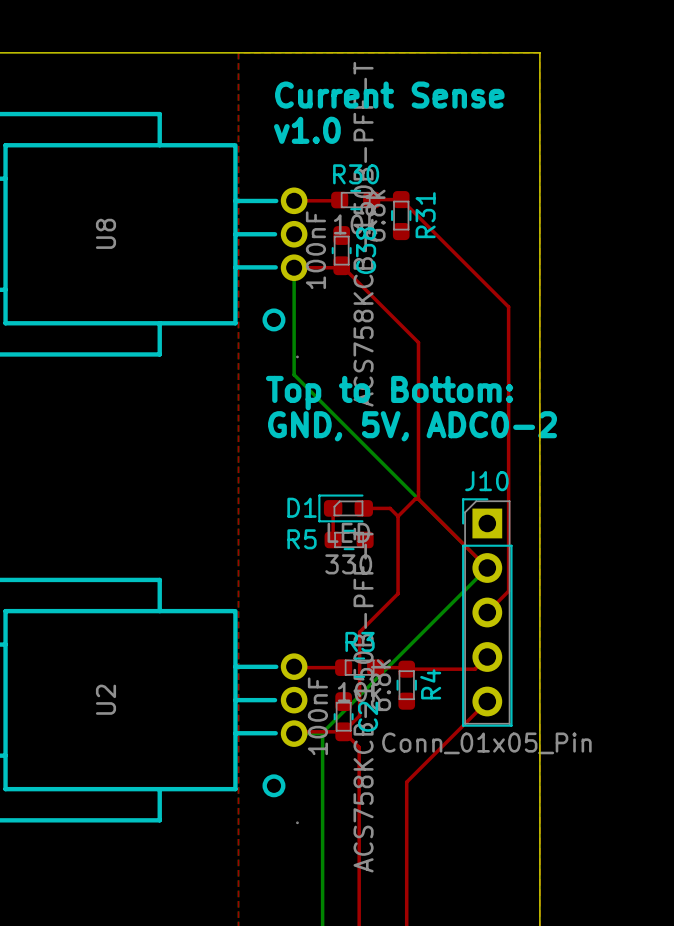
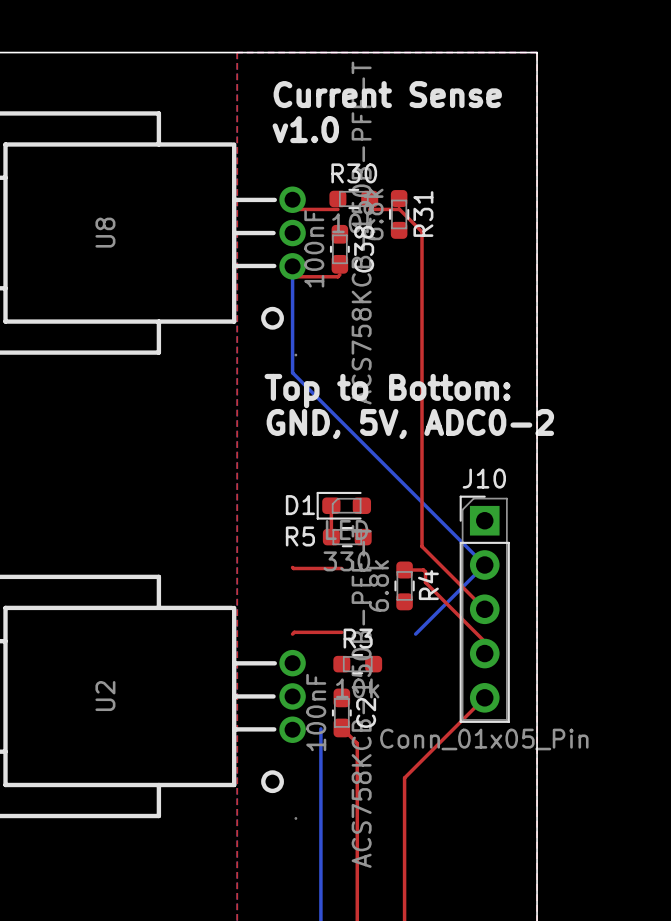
top track: (339, 200) (294, 200) -> none
top track: (371, 200) (401, 199) (508, 306) (508, 591) (487, 612) -> (369, 209) (399, 209) (422, 231) (422, 546) (484, 609)
top track: none -> (337, 209) (292, 210)
top track: (294, 267) (339, 267) (341, 265) (418, 342) (418, 499) -> none
top track: none -> (339, 274) (337, 276) (292, 276)
top track: (418, 499) (415, 499) (398, 516) -> none
top track: (418, 499) (487, 567) -> none
top track: (363, 508) (390, 508) (398, 516) -> none
top track: (398, 516) (398, 593) (359, 632) (359, 715) (343, 731) (295, 731) (294, 733) -> none
top track: none -> (404, 570) (423, 570) (425, 571) (425, 582) (484, 641) (484, 653) (486, 655)
top track: none -> (341, 632) (294, 632) (292, 634)
bottom track: (417, 637) (321, 733) (294, 733) -> none
top track: (487, 657) (475, 669) (375, 667) -> none
top track: (294, 666) (343, 667) -> (292, 567) (341, 568)
R4 position: (406, 685) -> (404, 585)

